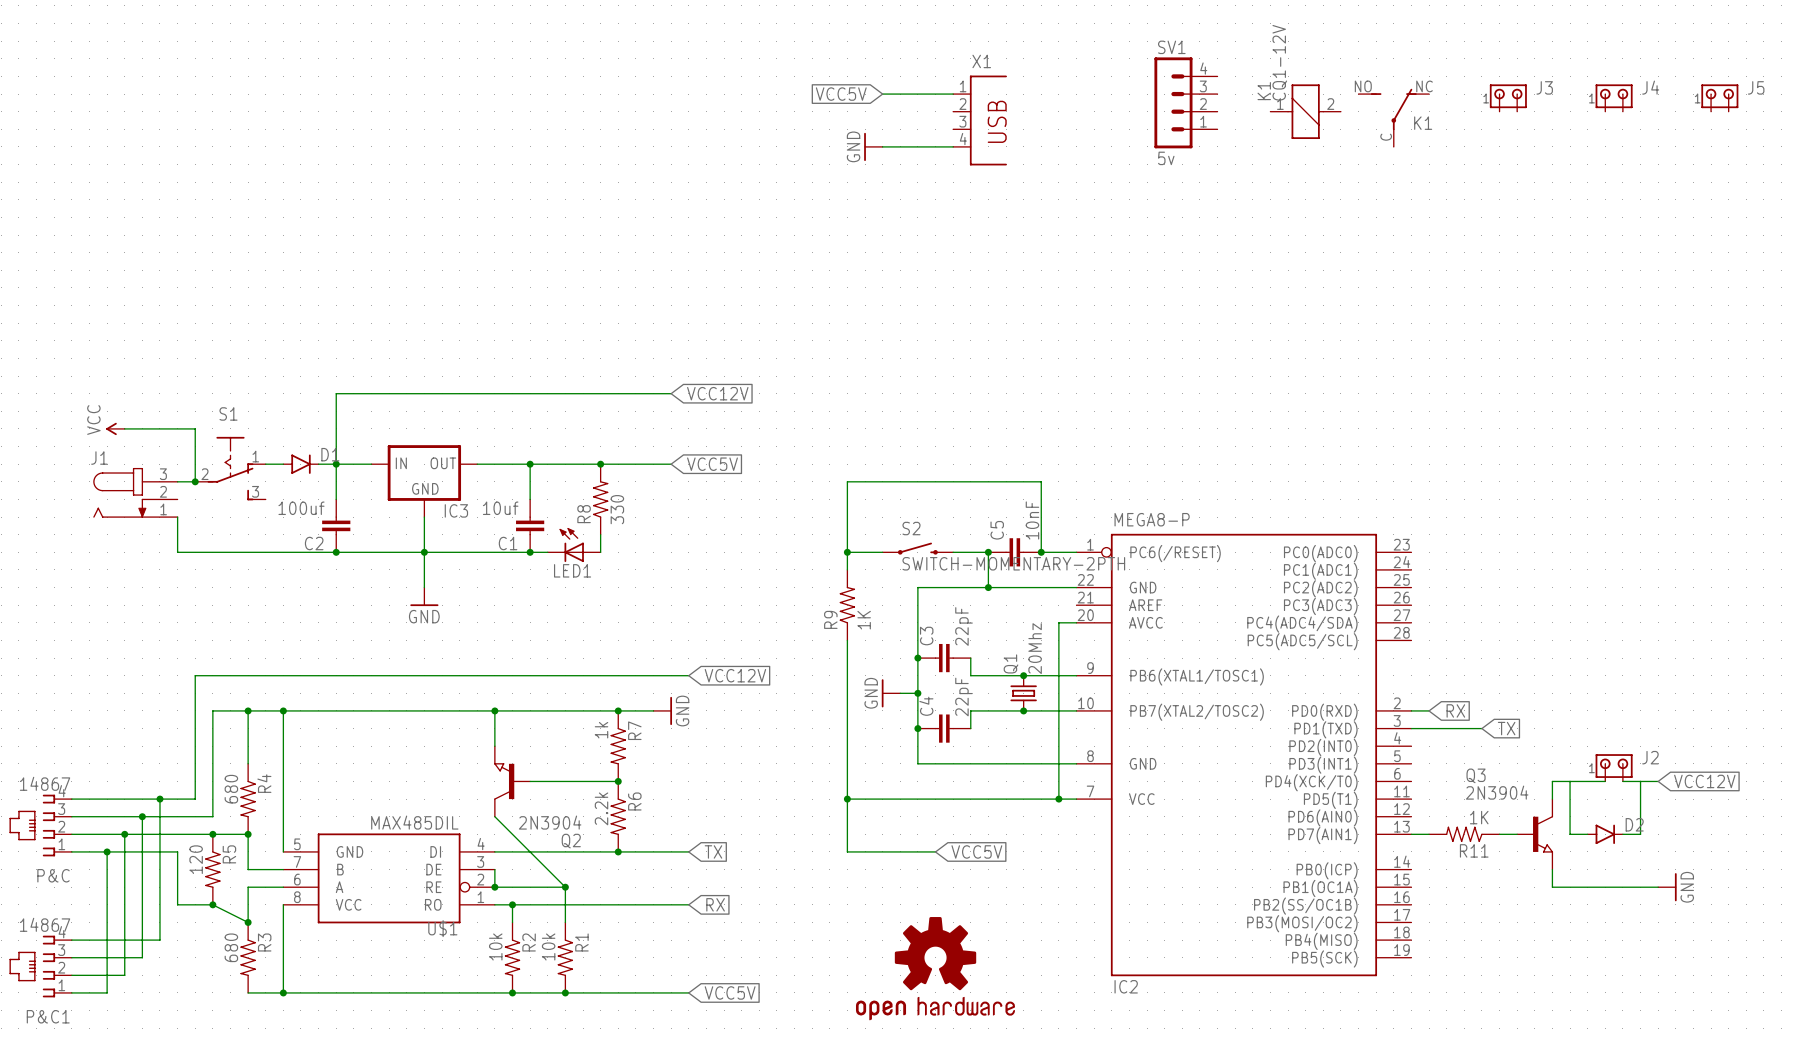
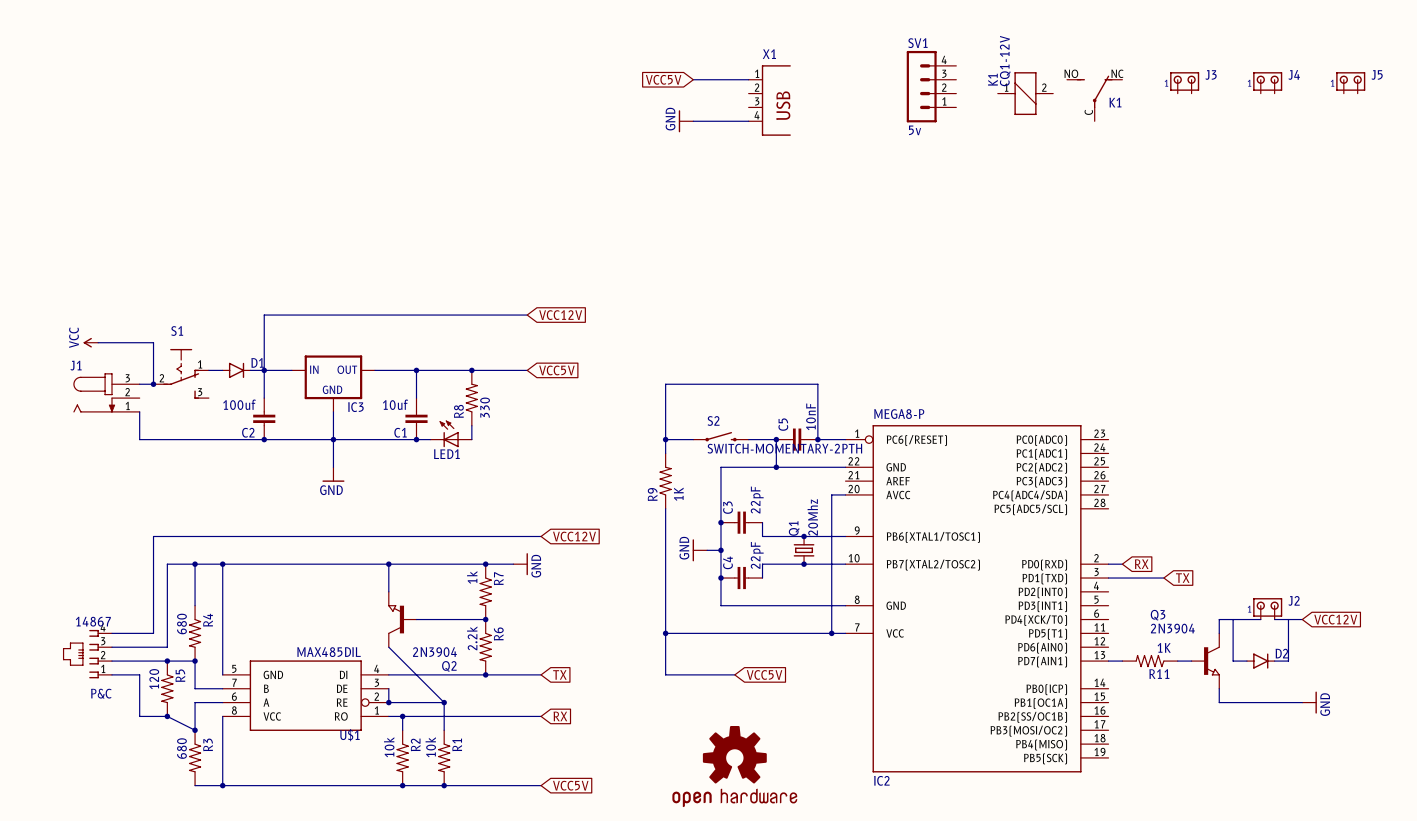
wire: (71, 799) (142, 799) -> none
wire: (159, 799) (159, 940) (71, 940) -> none
junction: (159, 799) -> none
wire: (71, 816) (142, 816) (142, 957) (71, 957) -> none
junction: (142, 816) -> none
P&C position: (40, 825) -> (87, 654)
wire: (71, 834) (142, 834) -> none
wire: (124, 834) (124, 975) (71, 975) -> none
junction: (124, 834) -> none
wire: (71, 851) (142, 851) -> none
wire: (107, 851) (107, 992) (71, 992) -> none
junction: (107, 851) -> none
P&C1: 14867 (40, 966) -> none

